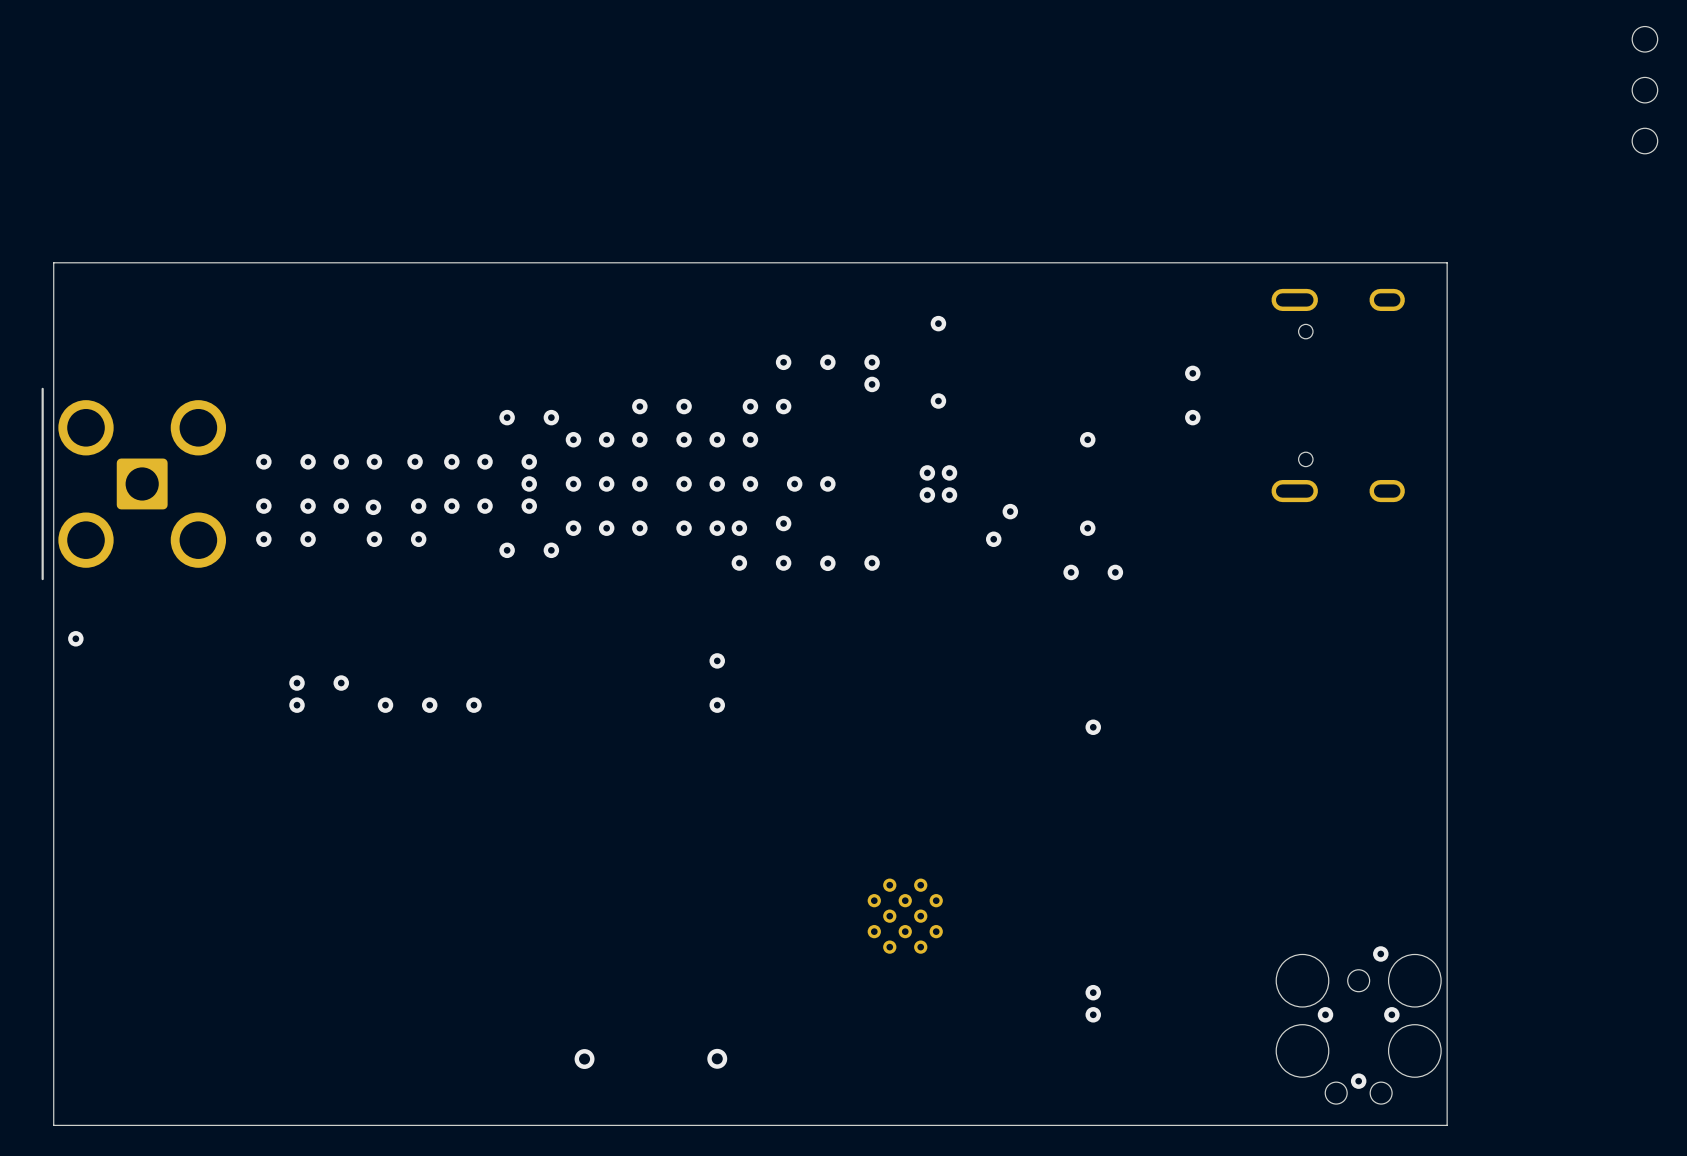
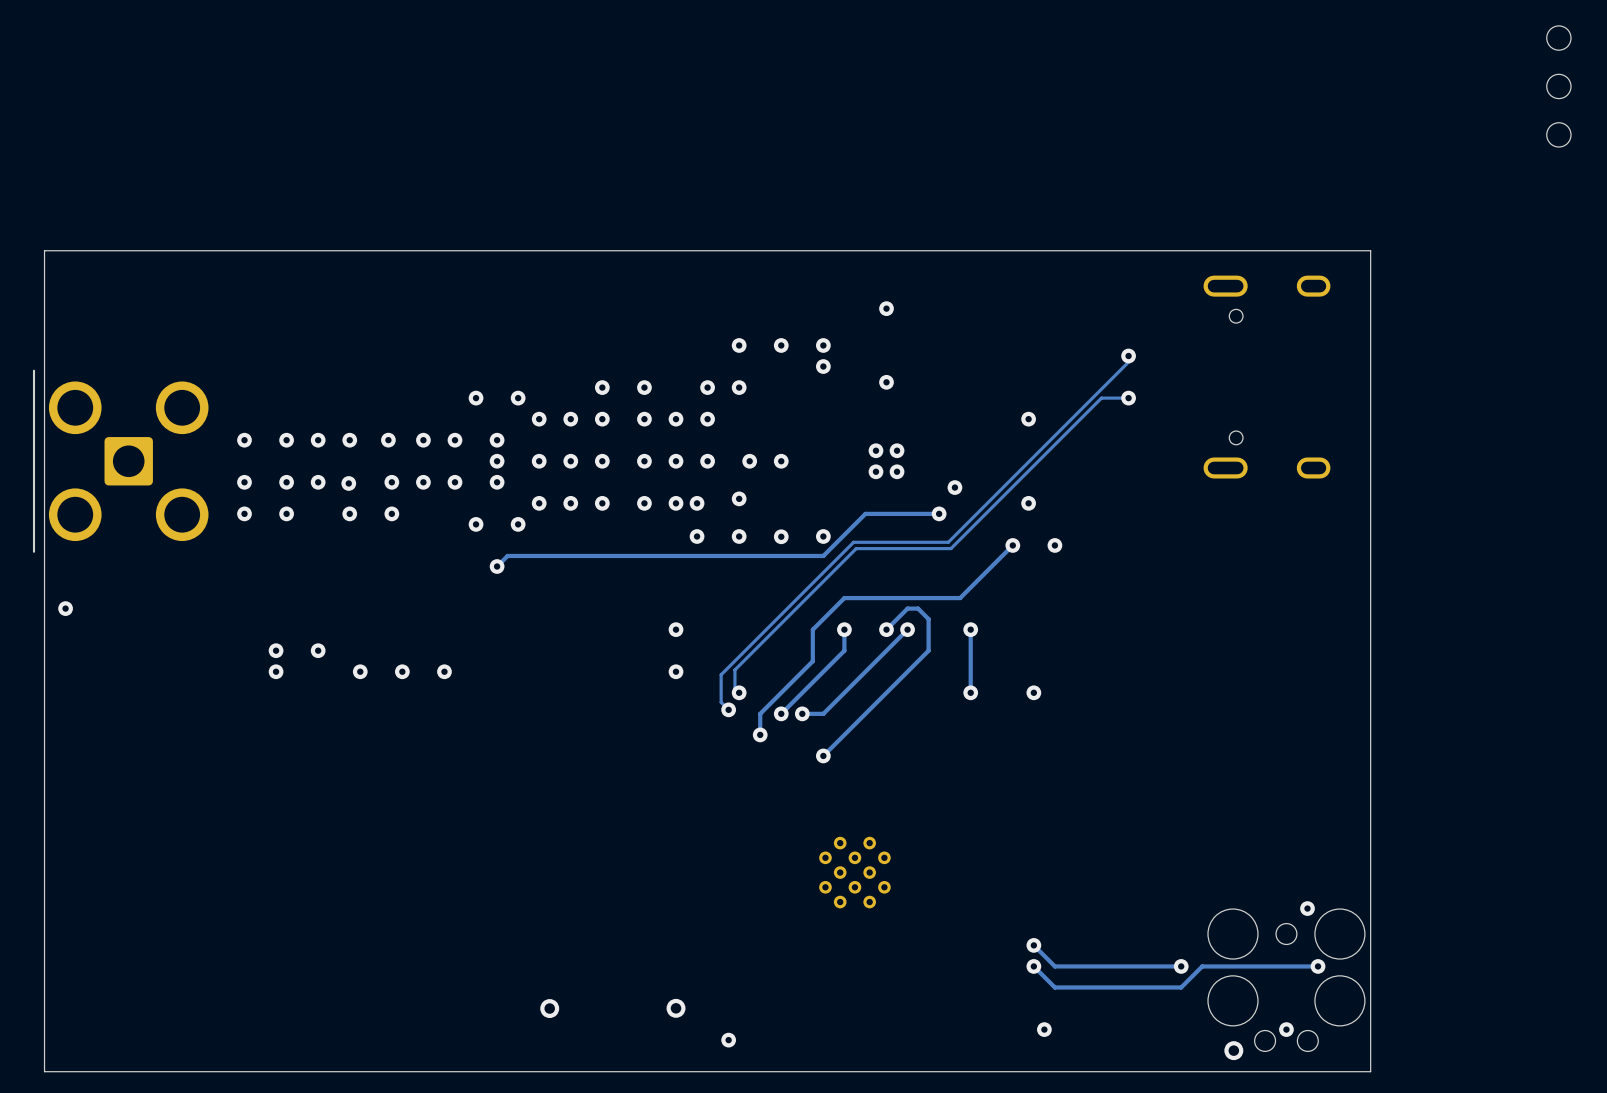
track: none -> (1128, 356) (1128, 362) (948, 542) (853, 542) (721, 674) (721, 702) (728, 709)
track: none -> (1128, 398) (1101, 398) (950, 548) (856, 548) (734, 669) (734, 688) (739, 692)
track: none -> (939, 513) (865, 513) (823, 555) (507, 555) (497, 566)
track: none -> (1012, 545) (960, 598) (844, 598) (812, 629) (812, 661) (760, 713) (760, 734)
via: none -> (497, 566)
track: none -> (844, 629) (844, 650) (781, 713)
via: none -> (844, 629)
track: none -> (886, 629) (907, 608) (918, 608) (928, 619) (928, 650) (823, 755)
via: none -> (886, 629)
track: none -> (907, 629) (823, 713) (802, 713)
via: none -> (907, 629)
track: none -> (970, 629) (970, 692)
via: none -> (970, 629)
via: none -> (739, 692)
via: none -> (970, 692)
via: none -> (728, 709)
via: none -> (781, 713)
via: none -> (802, 713)
via: none -> (760, 734)
via: none -> (823, 755)
track: none -> (1033, 945) (1054, 966) (1181, 966)
via position: (1325, 1014) -> (1181, 966)
track: none -> (1318, 966) (1202, 966) (1181, 987) (1054, 987) (1033, 966)
via: none -> (1044, 1029)
via: none -> (728, 1040)
via: none -> (1233, 1050)

